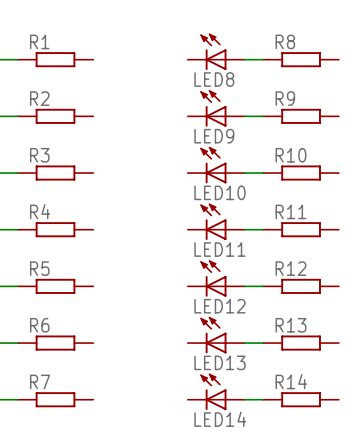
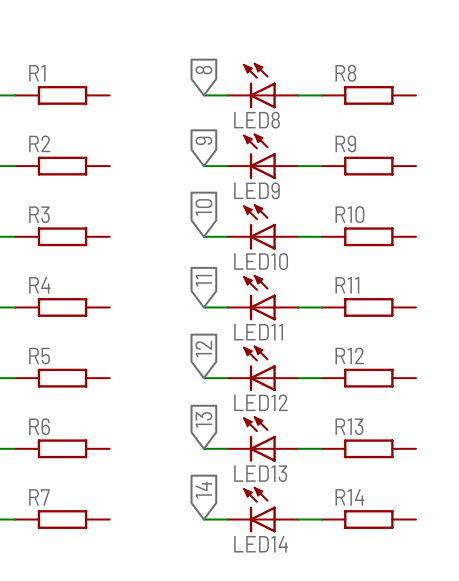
global label: none -> 8 (203, 70)
wire: none -> (203, 95) (227, 95)
global label: none -> 9 (203, 140)
wire: none -> (203, 166) (227, 166)
global label: none -> 10 (203, 207)
wire: none -> (203, 236) (227, 236)
global label: none -> 11 (203, 280)
wire: none -> (203, 307) (227, 307)
global label: none -> 12 (203, 348)
wire: none -> (203, 378) (227, 378)
global label: none -> 13 (203, 419)
wire: none -> (203, 448) (227, 448)
global label: none -> 14 (203, 490)
wire: none -> (203, 519) (227, 519)

